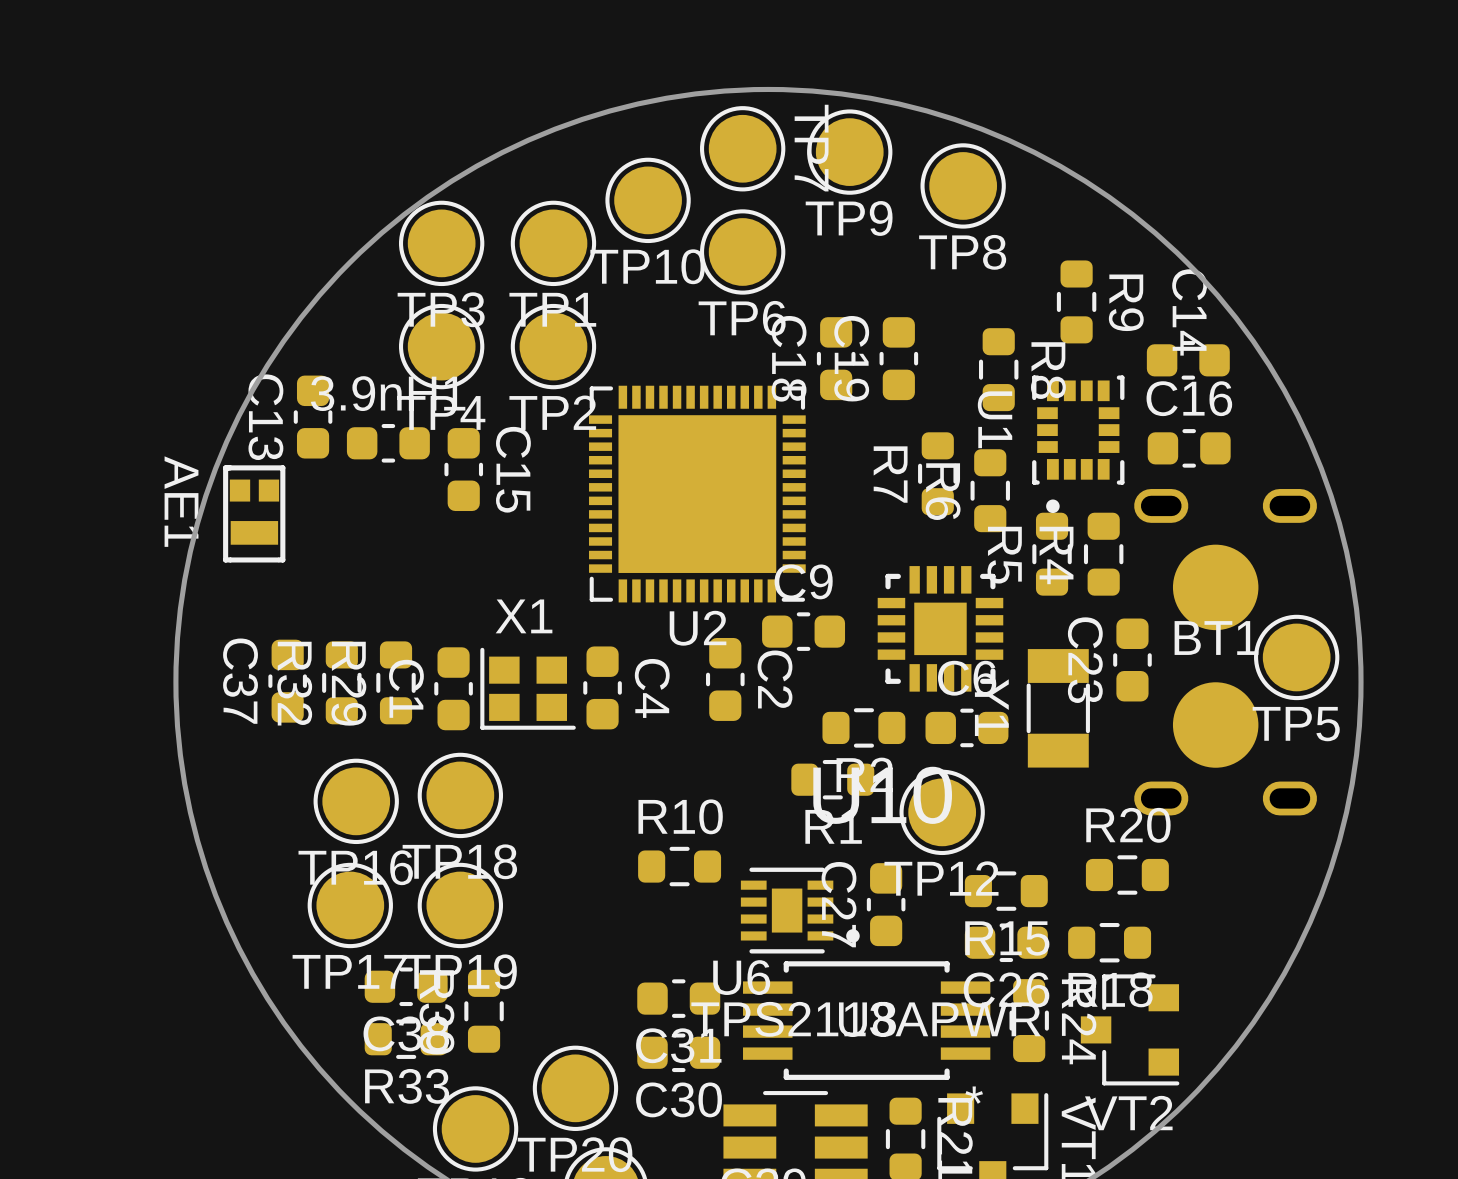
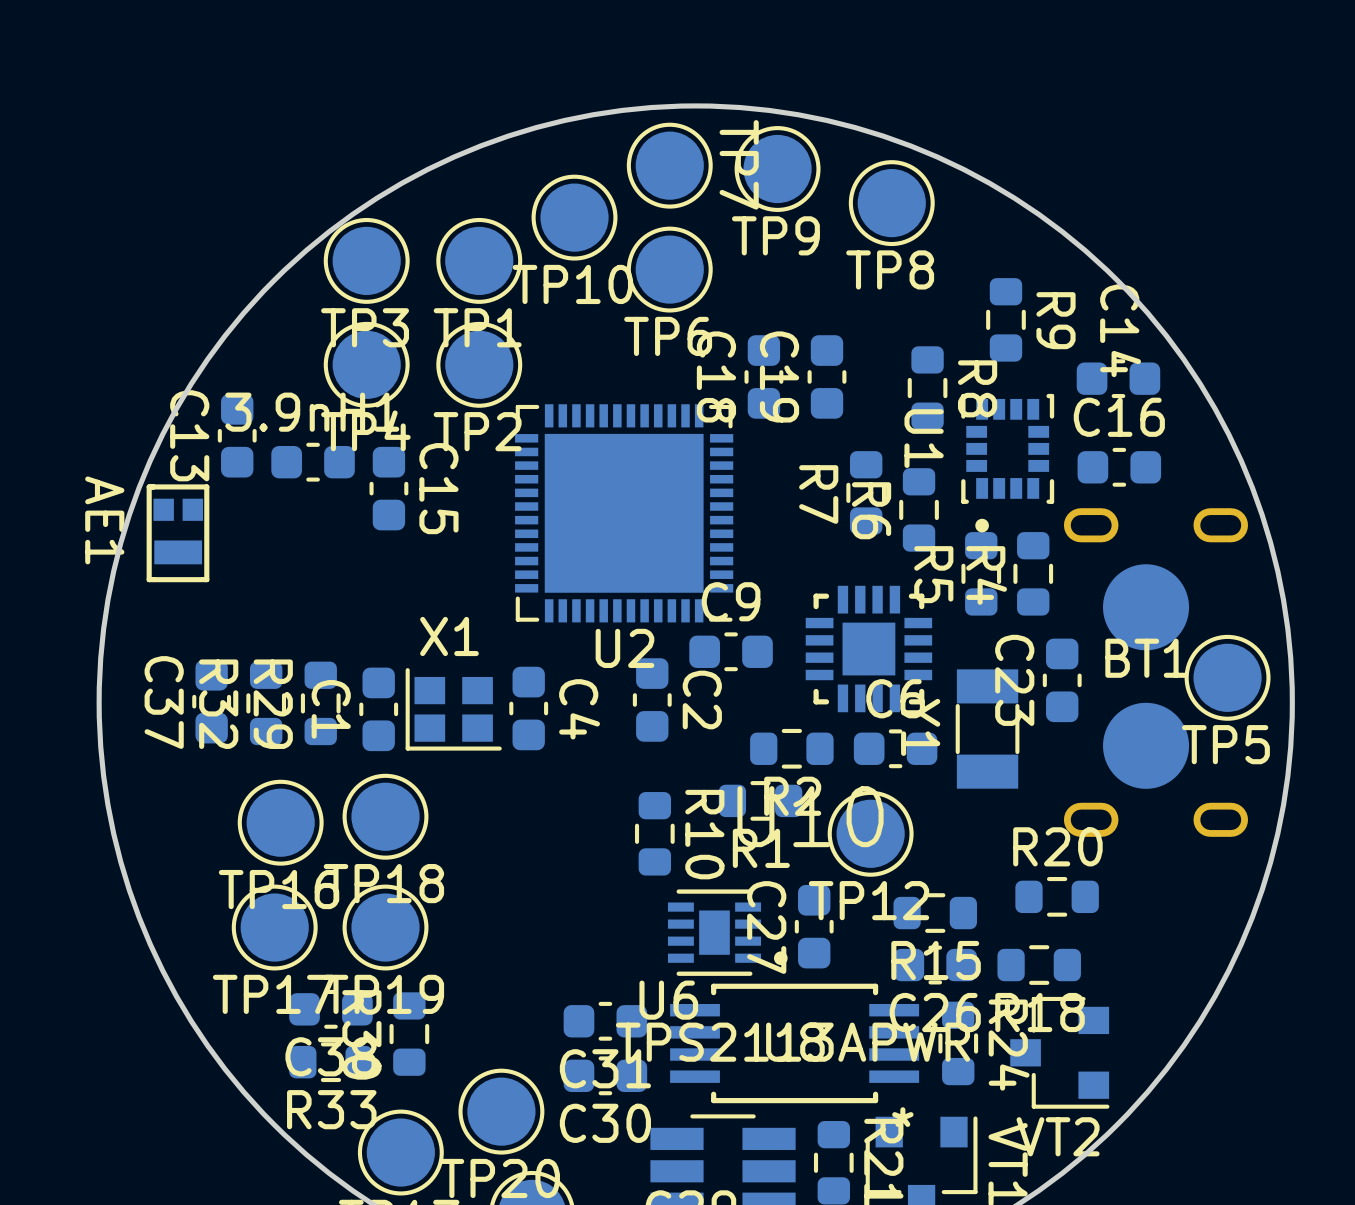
R10 rotation: 0° (679, 866) -> 90° clockwise (654, 833)
R10 position: (679, 866) -> (654, 833)

